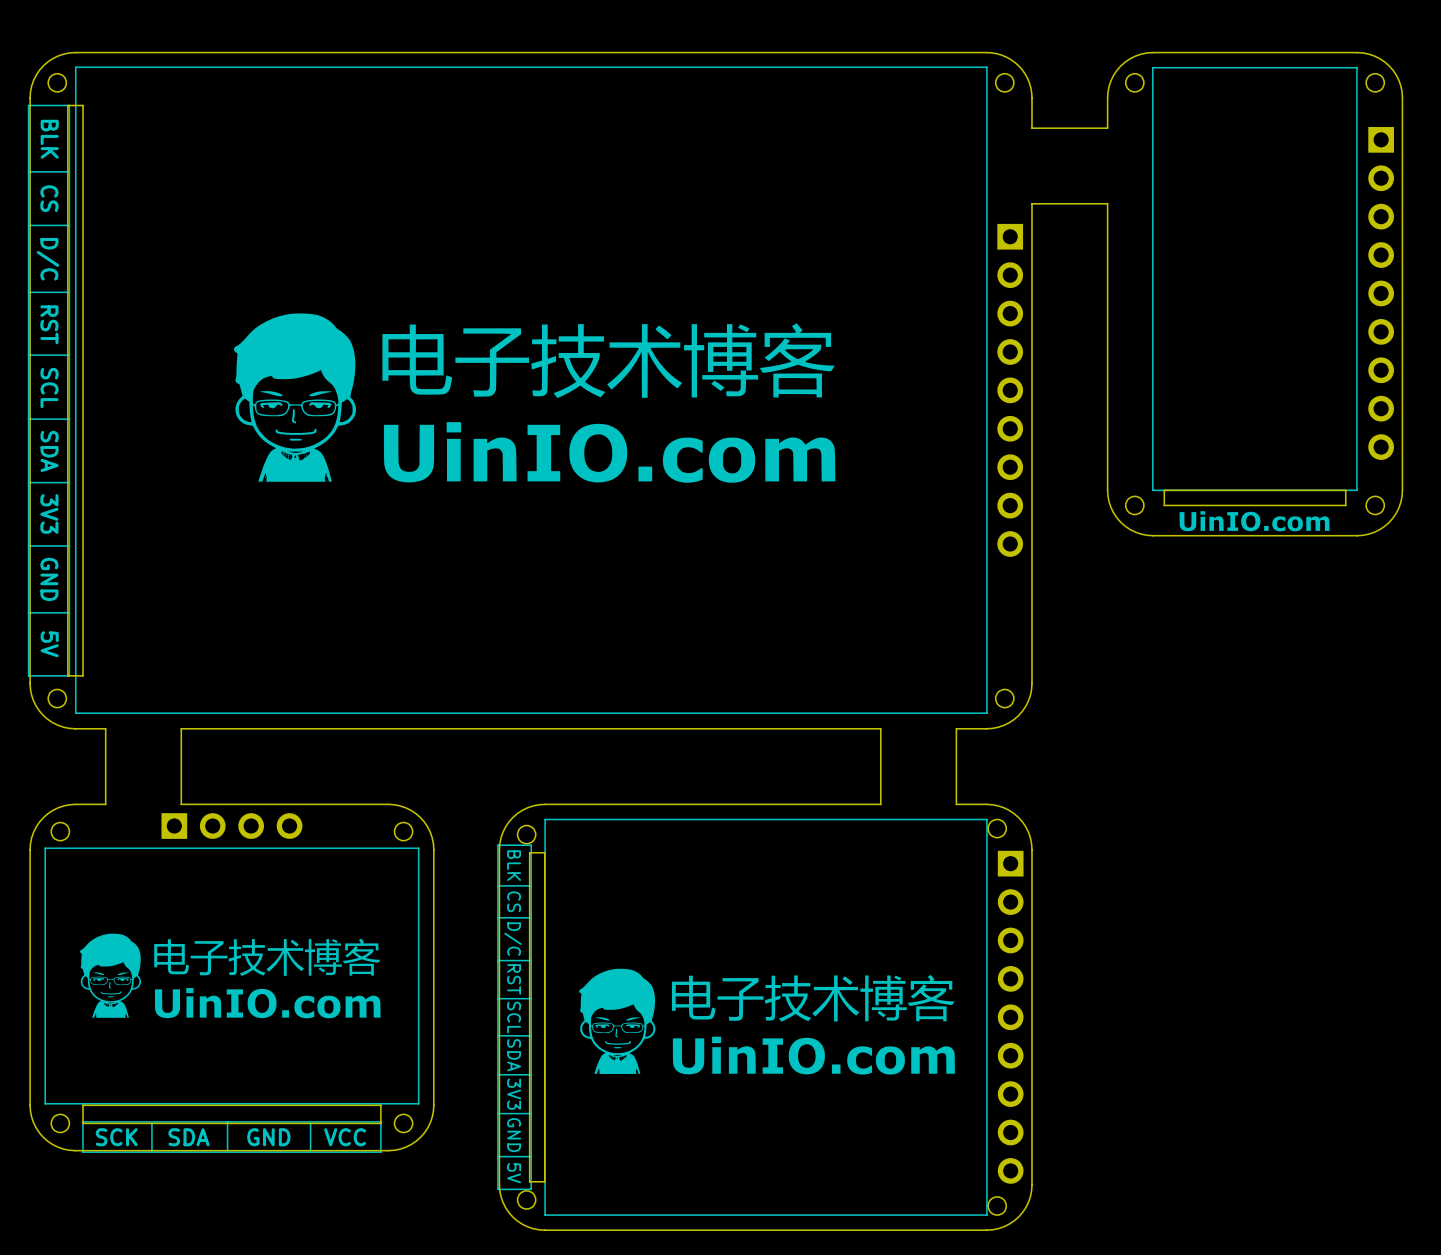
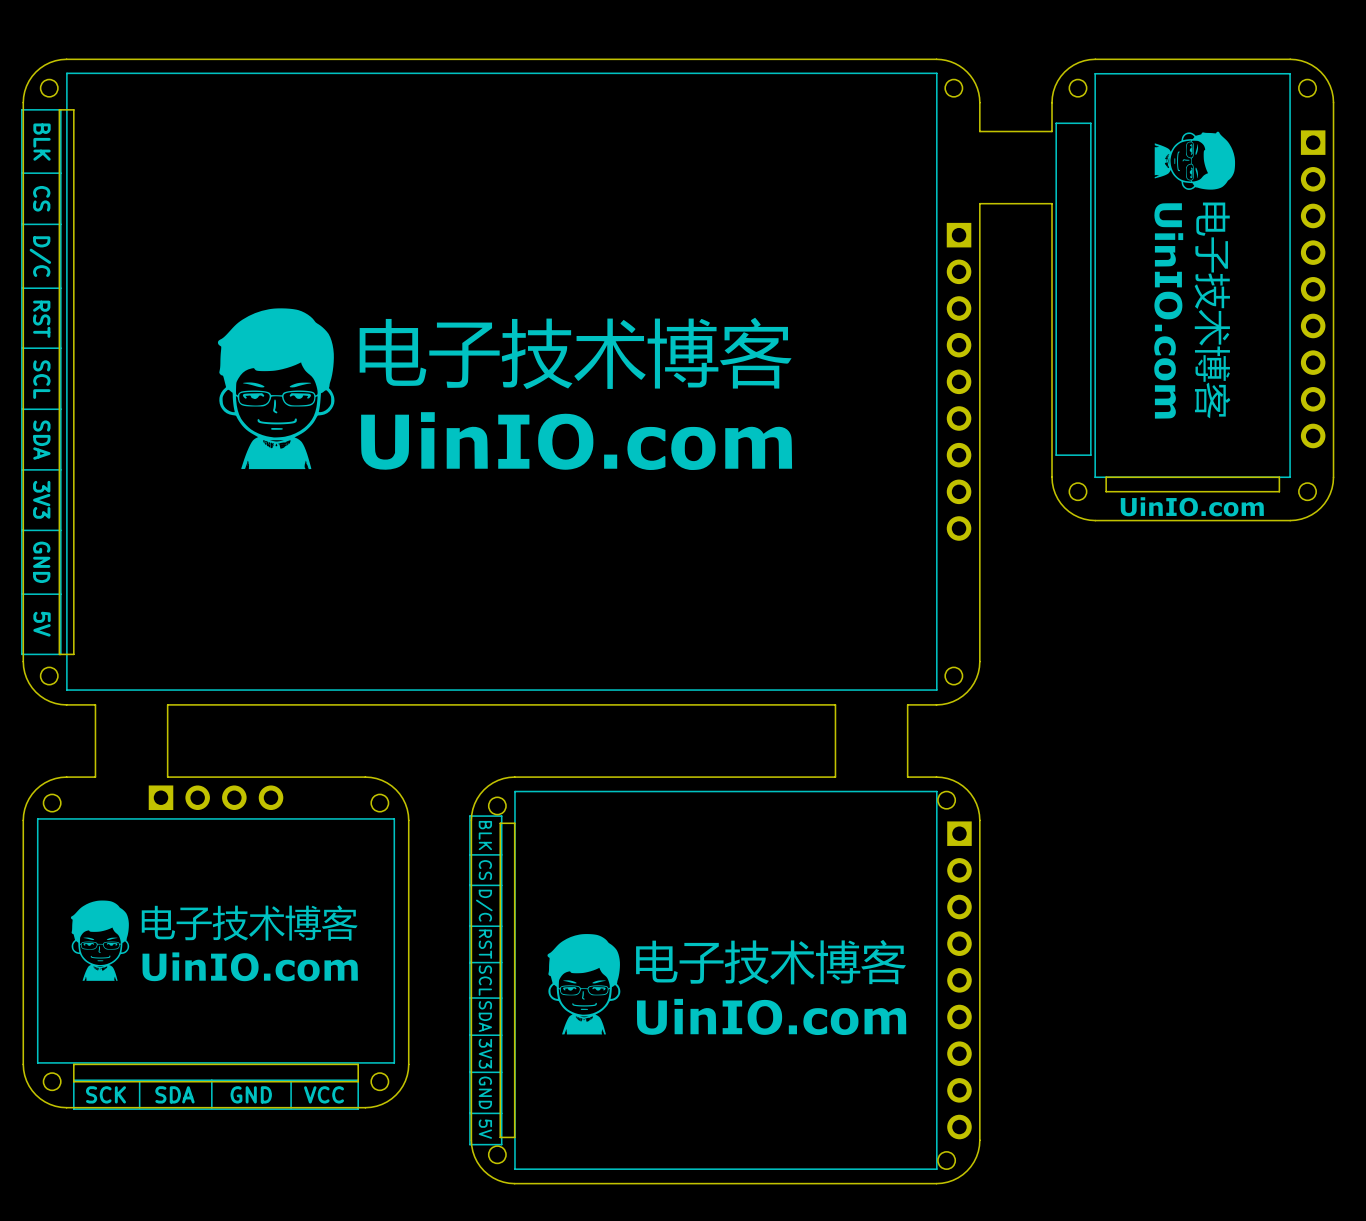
line: none -> (1090, 123) (1056, 123) (1056, 455) (1090, 455) (1090, 123)
drawing: none -> [1154, 131, 1236, 419]

